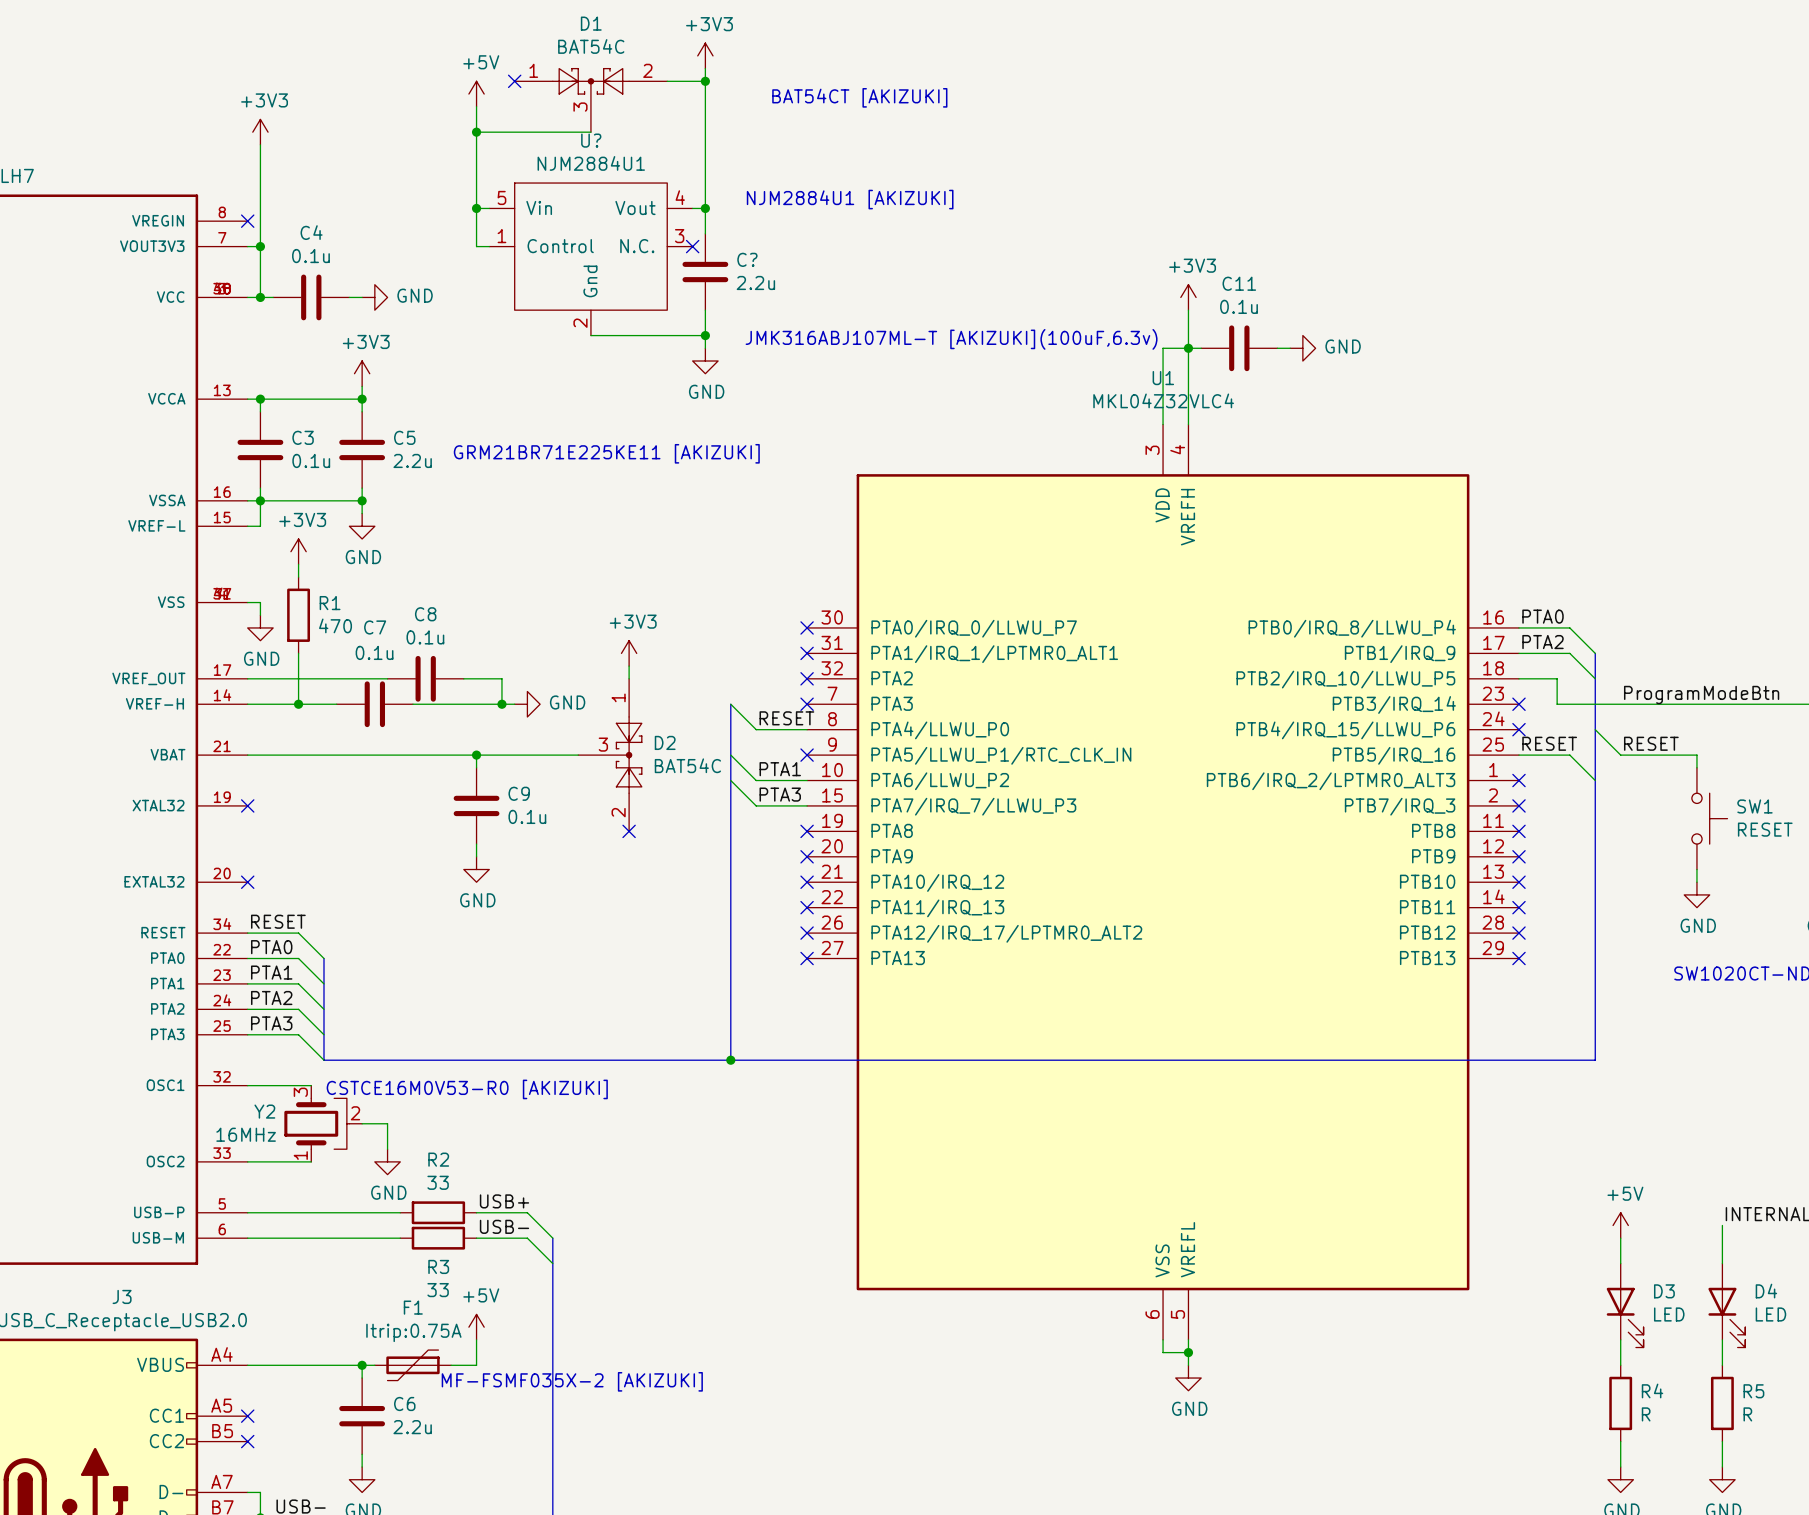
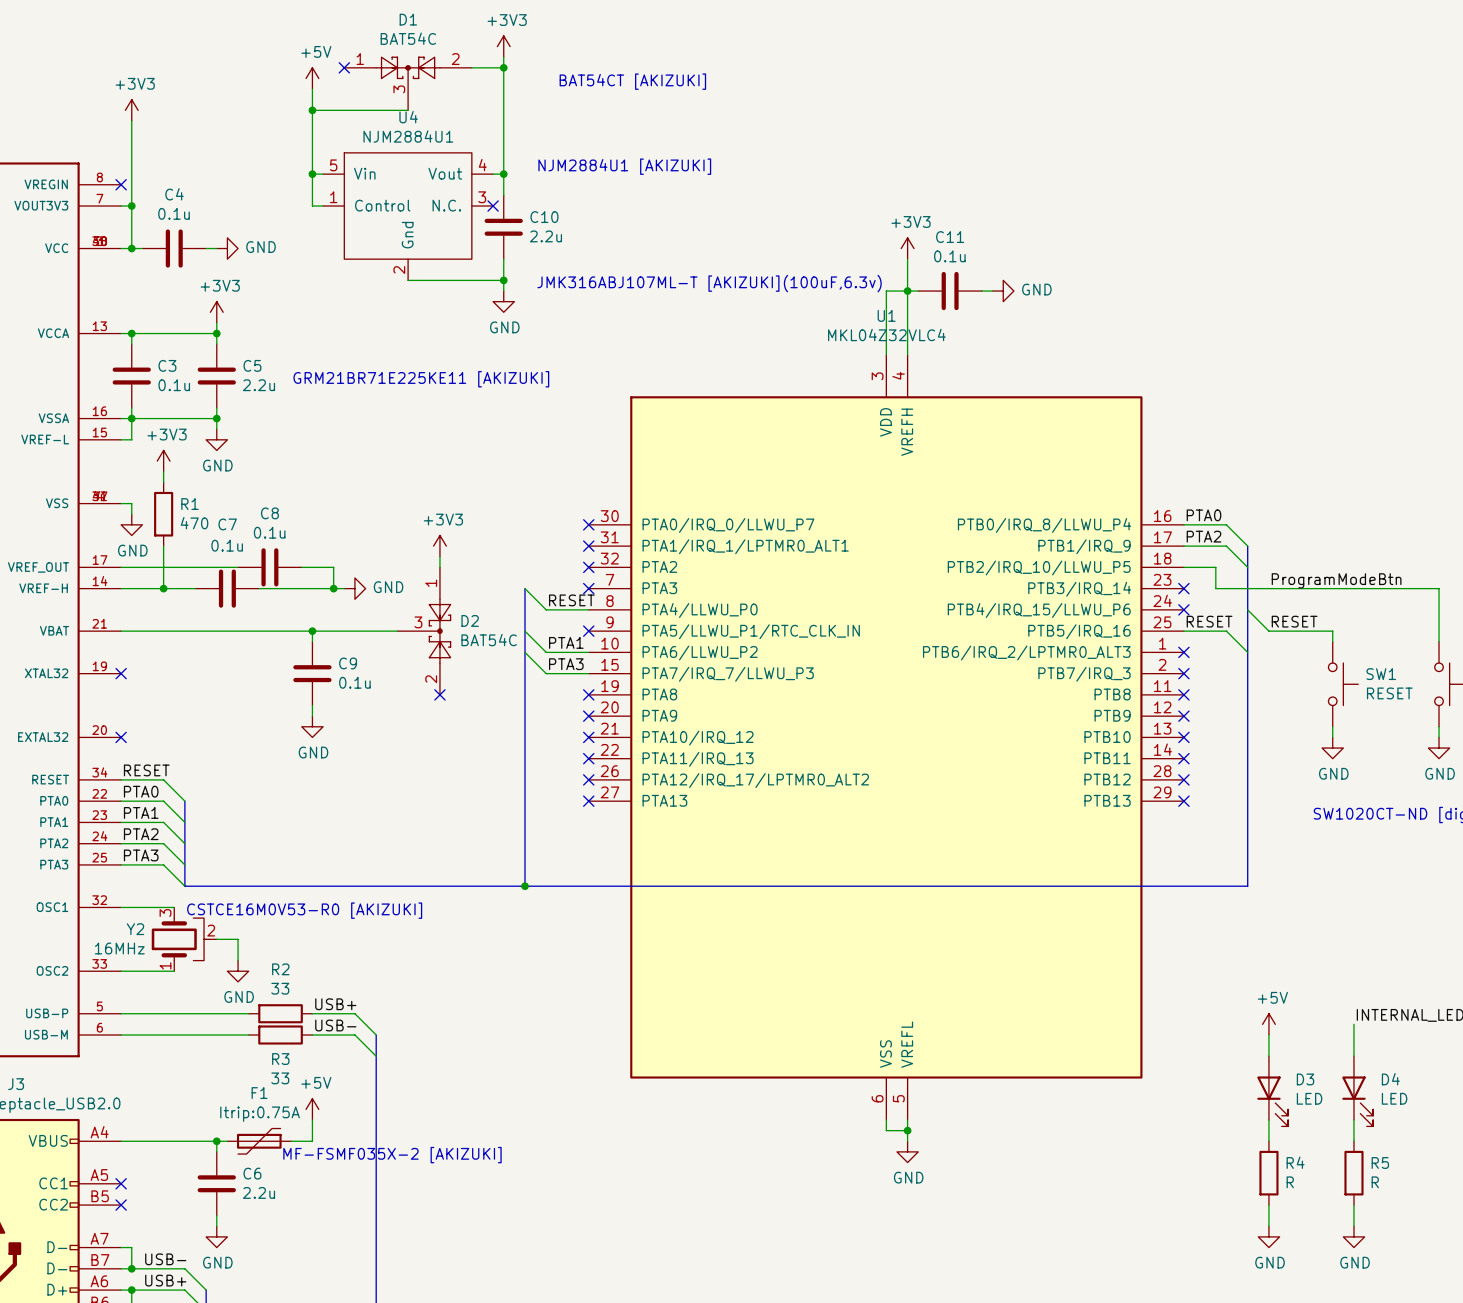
U? name: U? (591, 140) -> U4 (408, 117)
C? name: C? (747, 259) -> C10 (544, 217)

